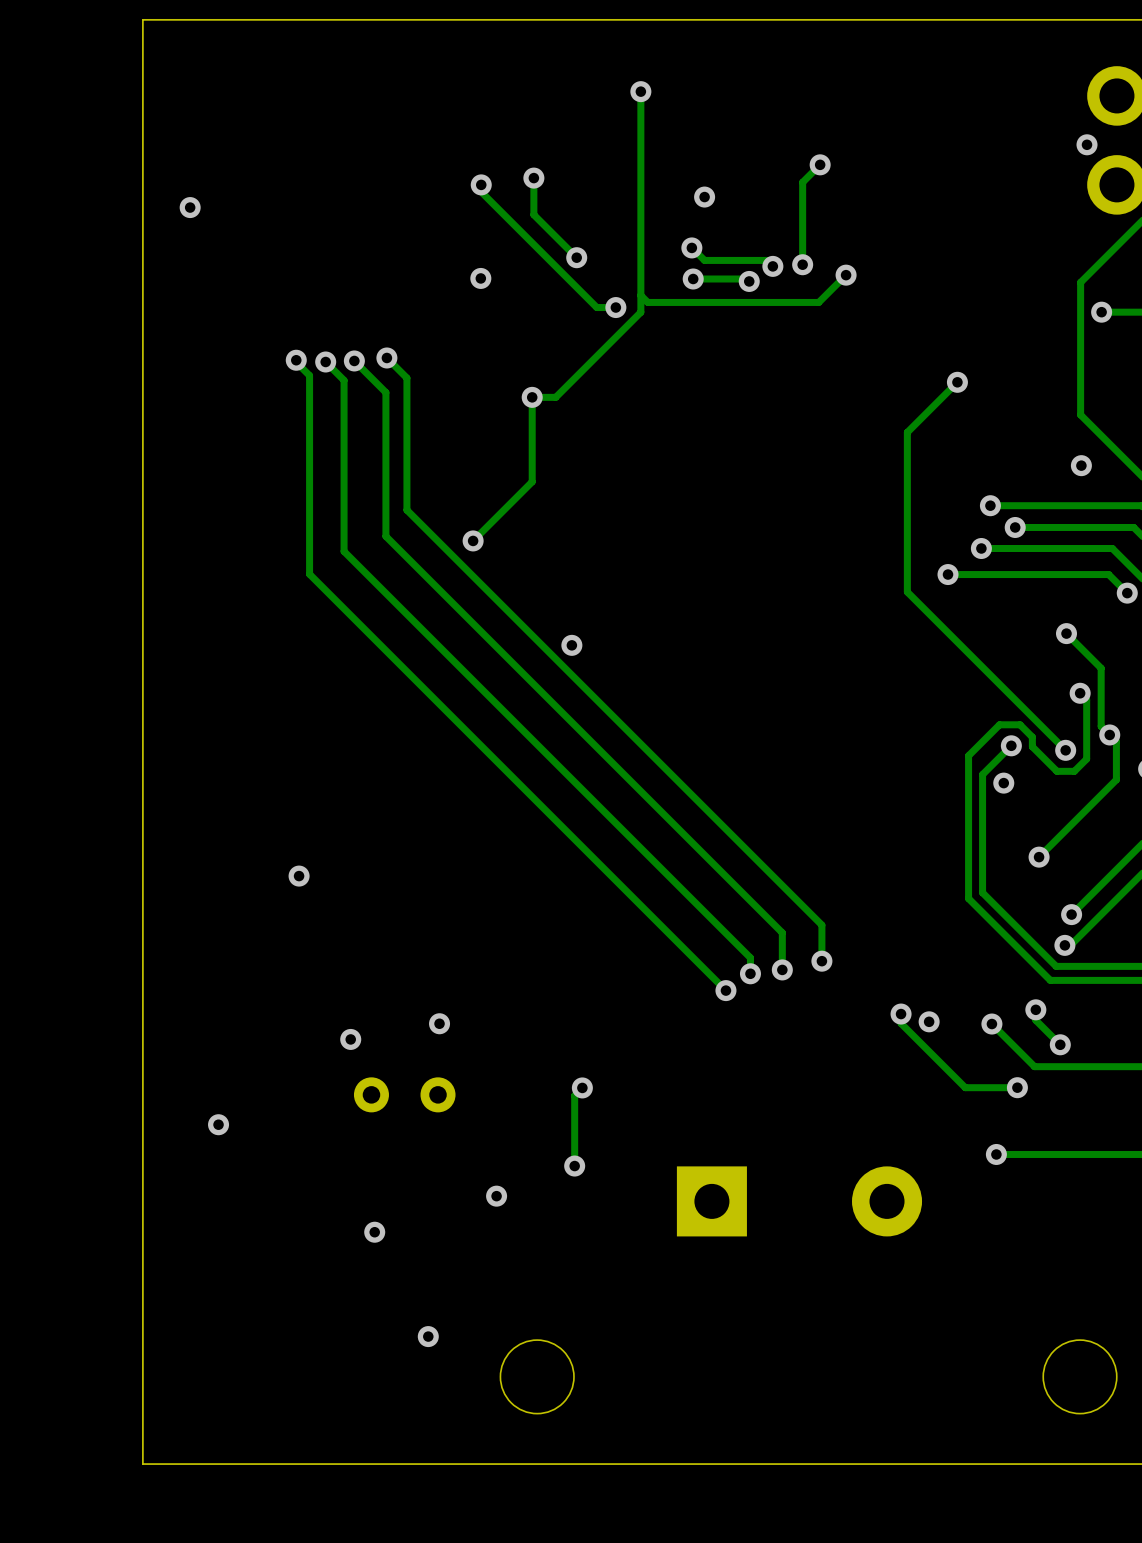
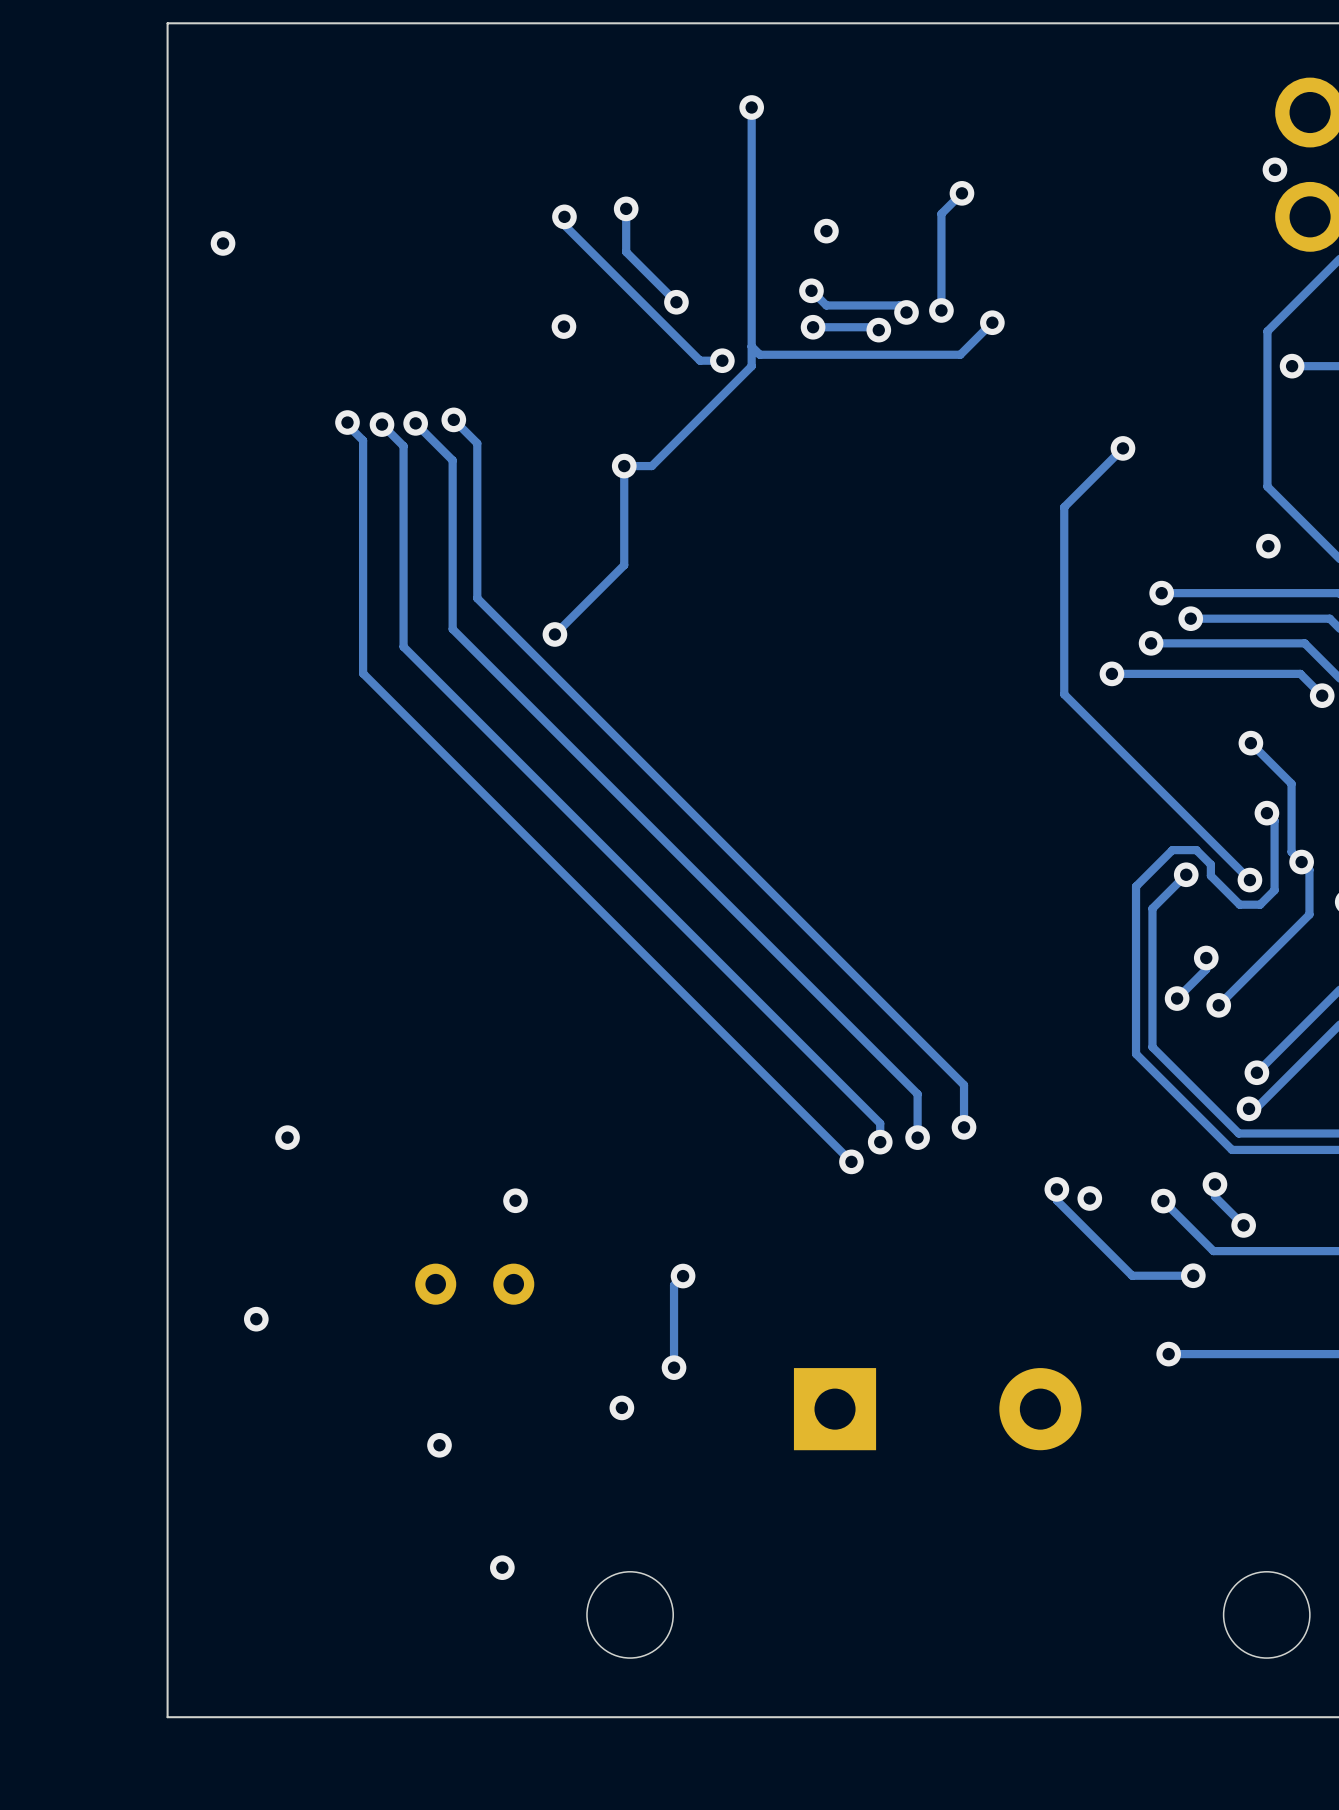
via: (571, 645) -> none
via: (1003, 783) -> none
track: none -> (1206, 958) (1206, 969) (1177, 998)
via: none -> (1206, 958)
via: none -> (1177, 998)
via: (299, 876) -> none
via: none -> (287, 1137)
via: (350, 1039) -> none
via position: (496, 1196) -> (621, 1407)

